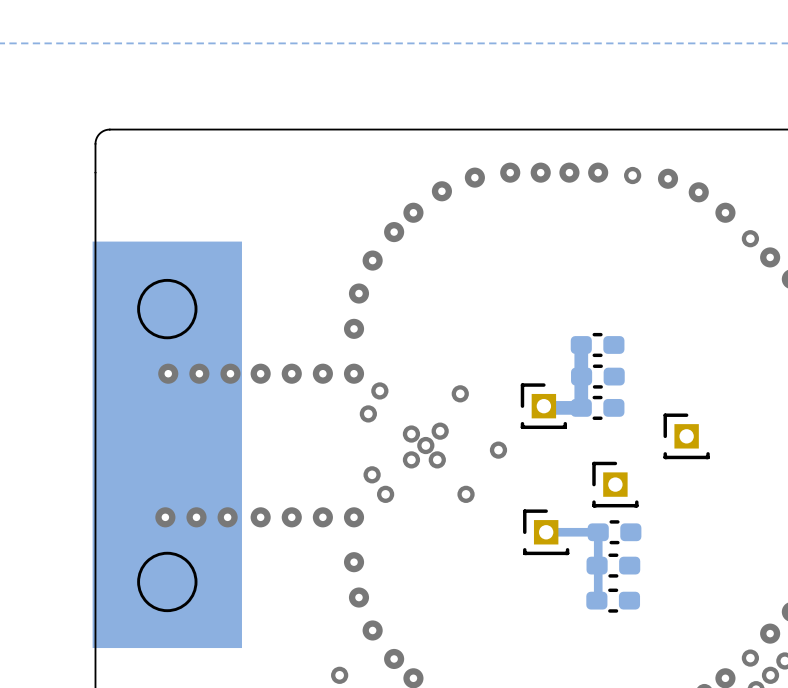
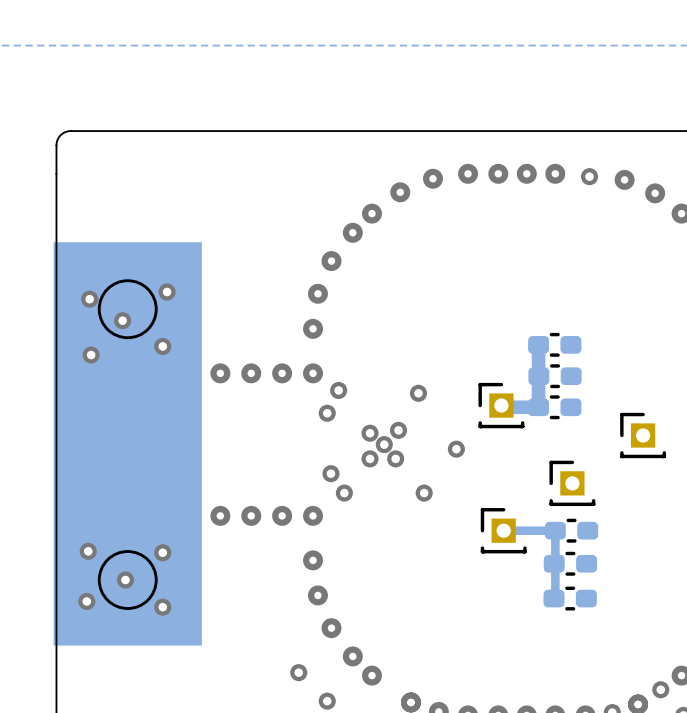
via: none -> (167, 292)
via: none -> (89, 299)
via: none -> (122, 320)
via: none -> (162, 346)
via: none -> (91, 355)
via: (168, 373) -> none
via: (199, 373) -> none
via: (230, 373) -> none
via: (165, 517) -> none
via: (196, 517) -> none
via: (227, 517) -> none
via: none -> (88, 551)
via: none -> (162, 552)
via: none -> (125, 579)
via: none -> (86, 601)
via: none -> (162, 607)

